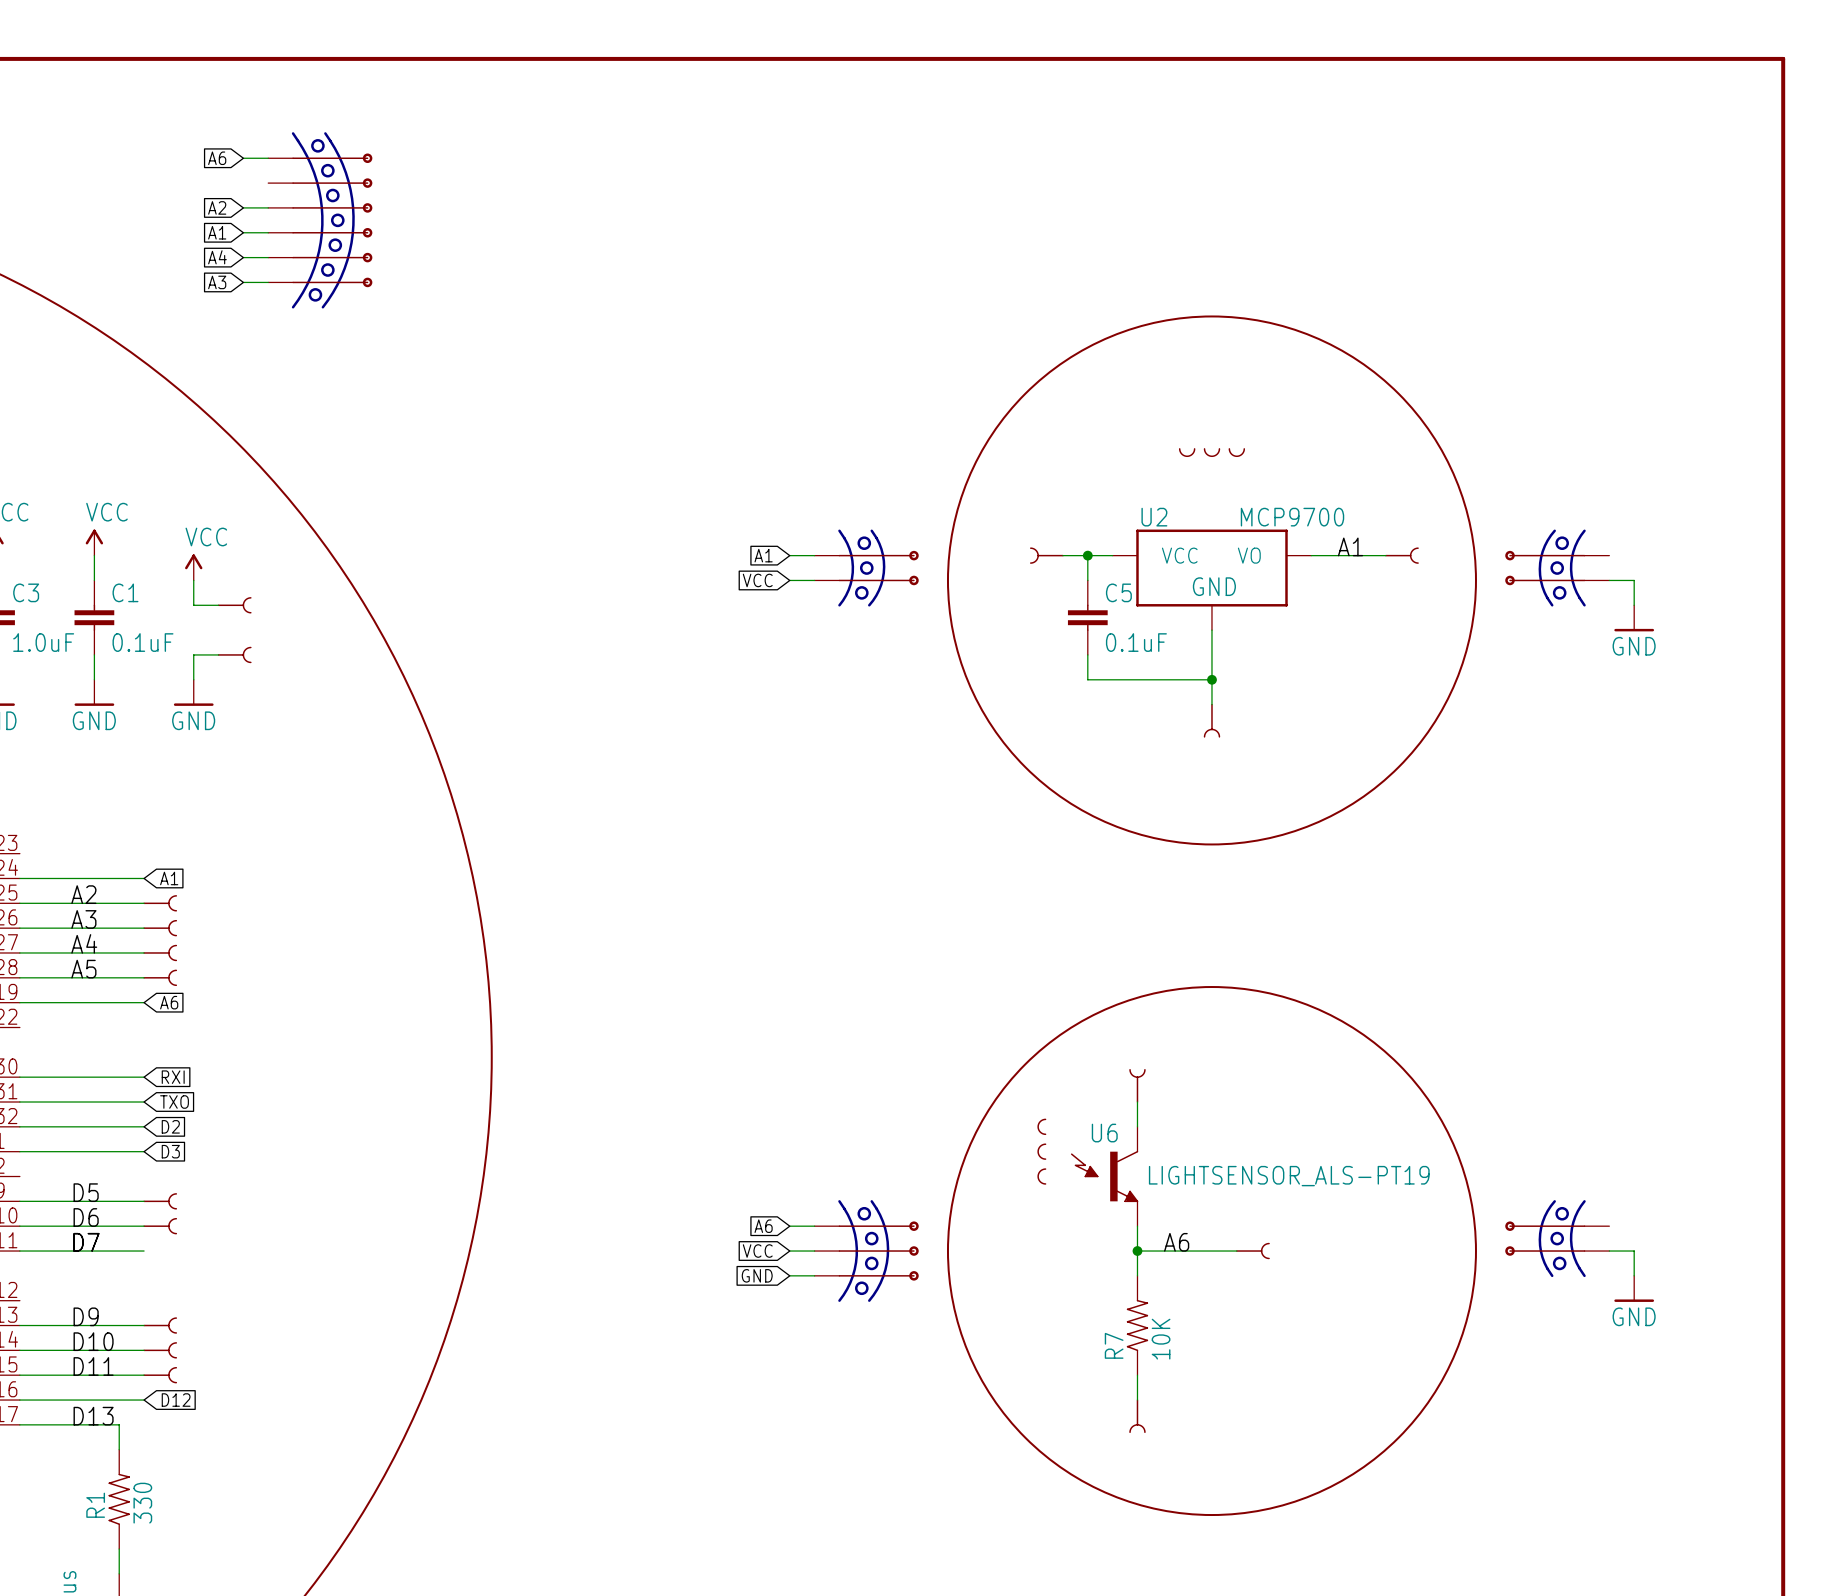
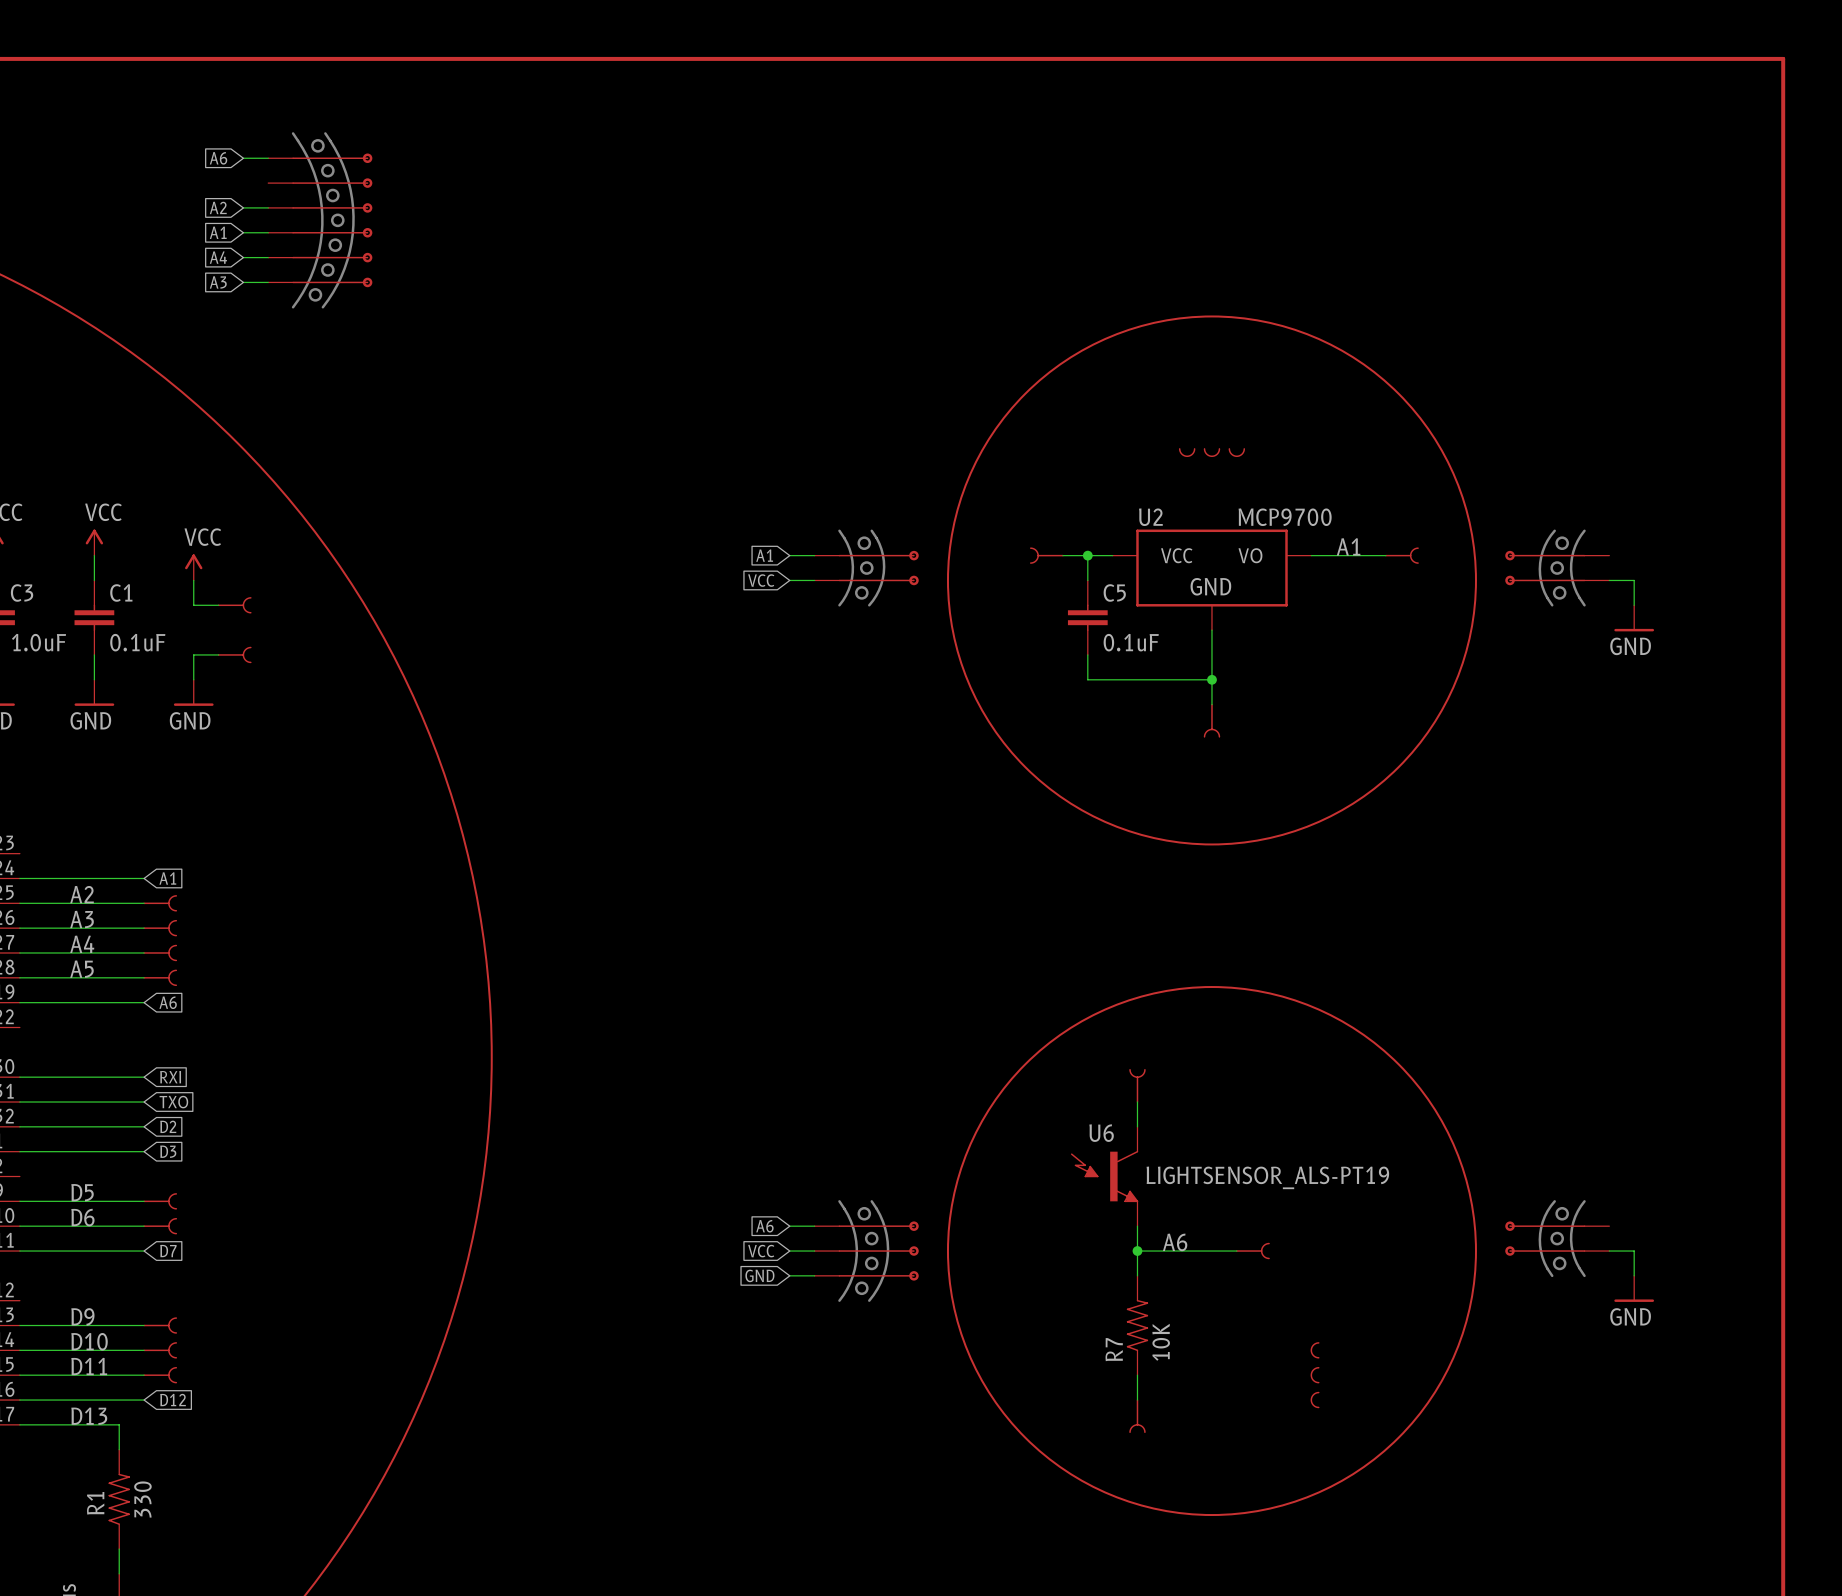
part: (1041, 1126) -> none
part: (1041, 1151) -> none
part: (1041, 1176) -> none
label: D7 (86, 1242) -> none
global label: none -> D7 (168, 1251)
part: none -> (1315, 1350)
part: none -> (1315, 1375)
part: none -> (1315, 1400)

